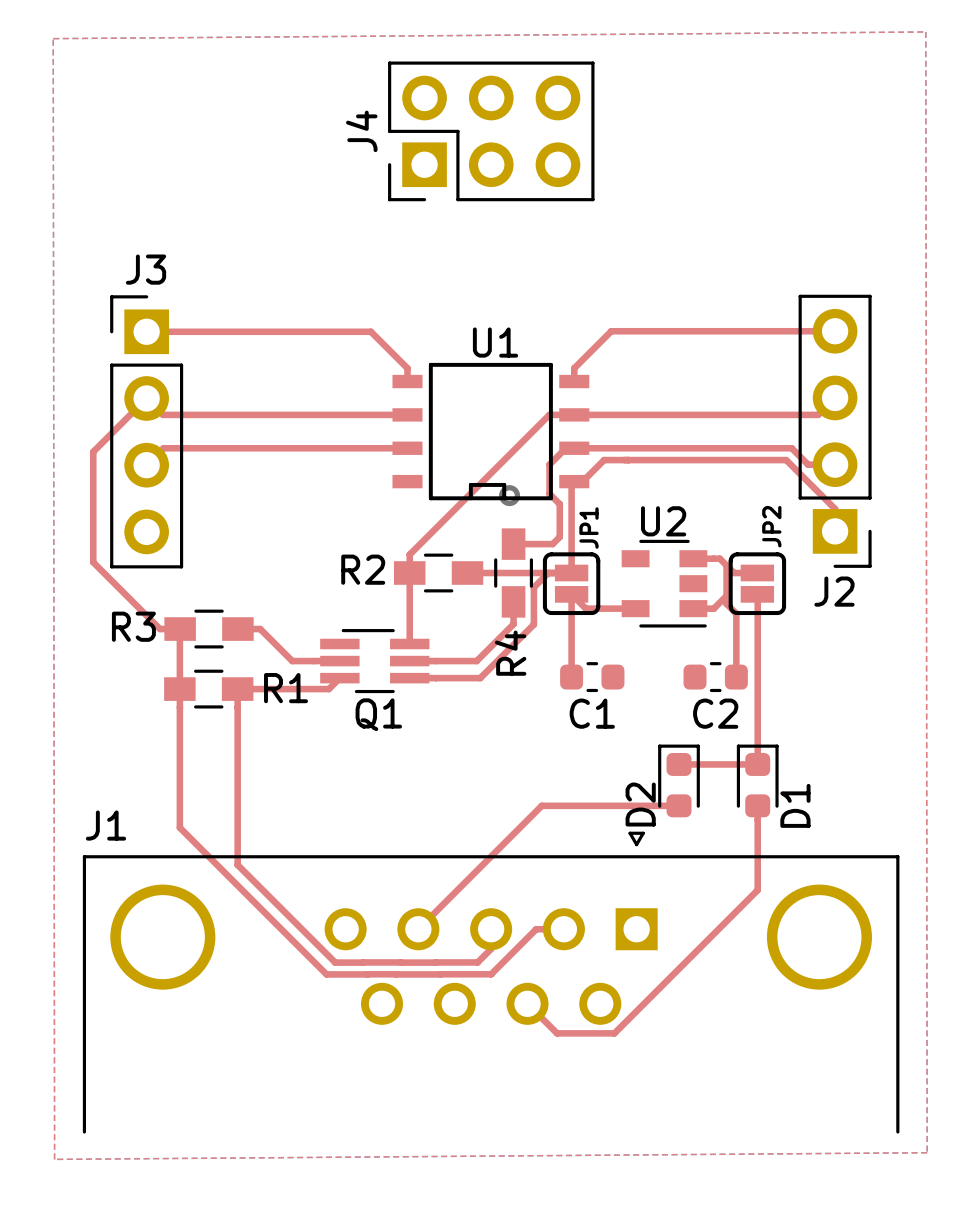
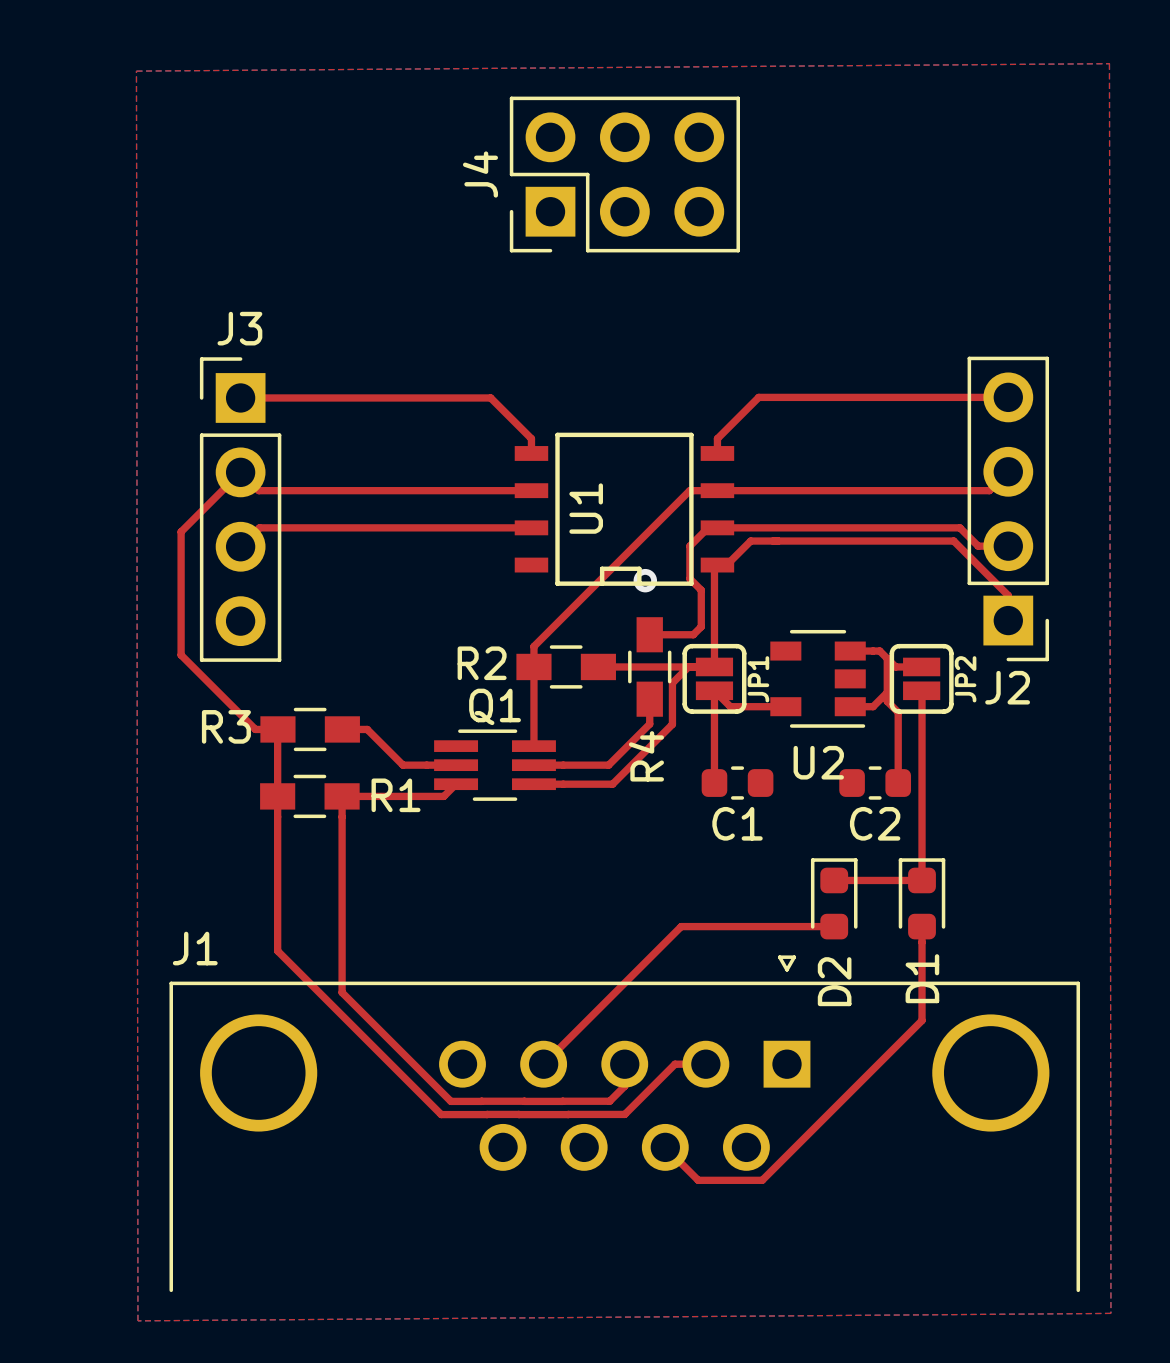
U1 name rotation: 0° (495, 342) -> 90° counterclockwise (586, 508)
U1 name position: U1 (495, 342) -> U1 (586, 508)
U2 name position: U2 (663, 521) -> U2 (818, 762)
JP2 name position: JP2 (771, 526) -> JP2 (965, 679)
JP1 name position: JP1 (589, 528) -> JP1 (758, 679)
Q1 name position: Q1 (378, 714) -> Q1 (495, 706)
D2 name position: D2 (640, 804) -> D2 (834, 981)
D1 name position: D1 (795, 805) -> D1 (922, 978)

